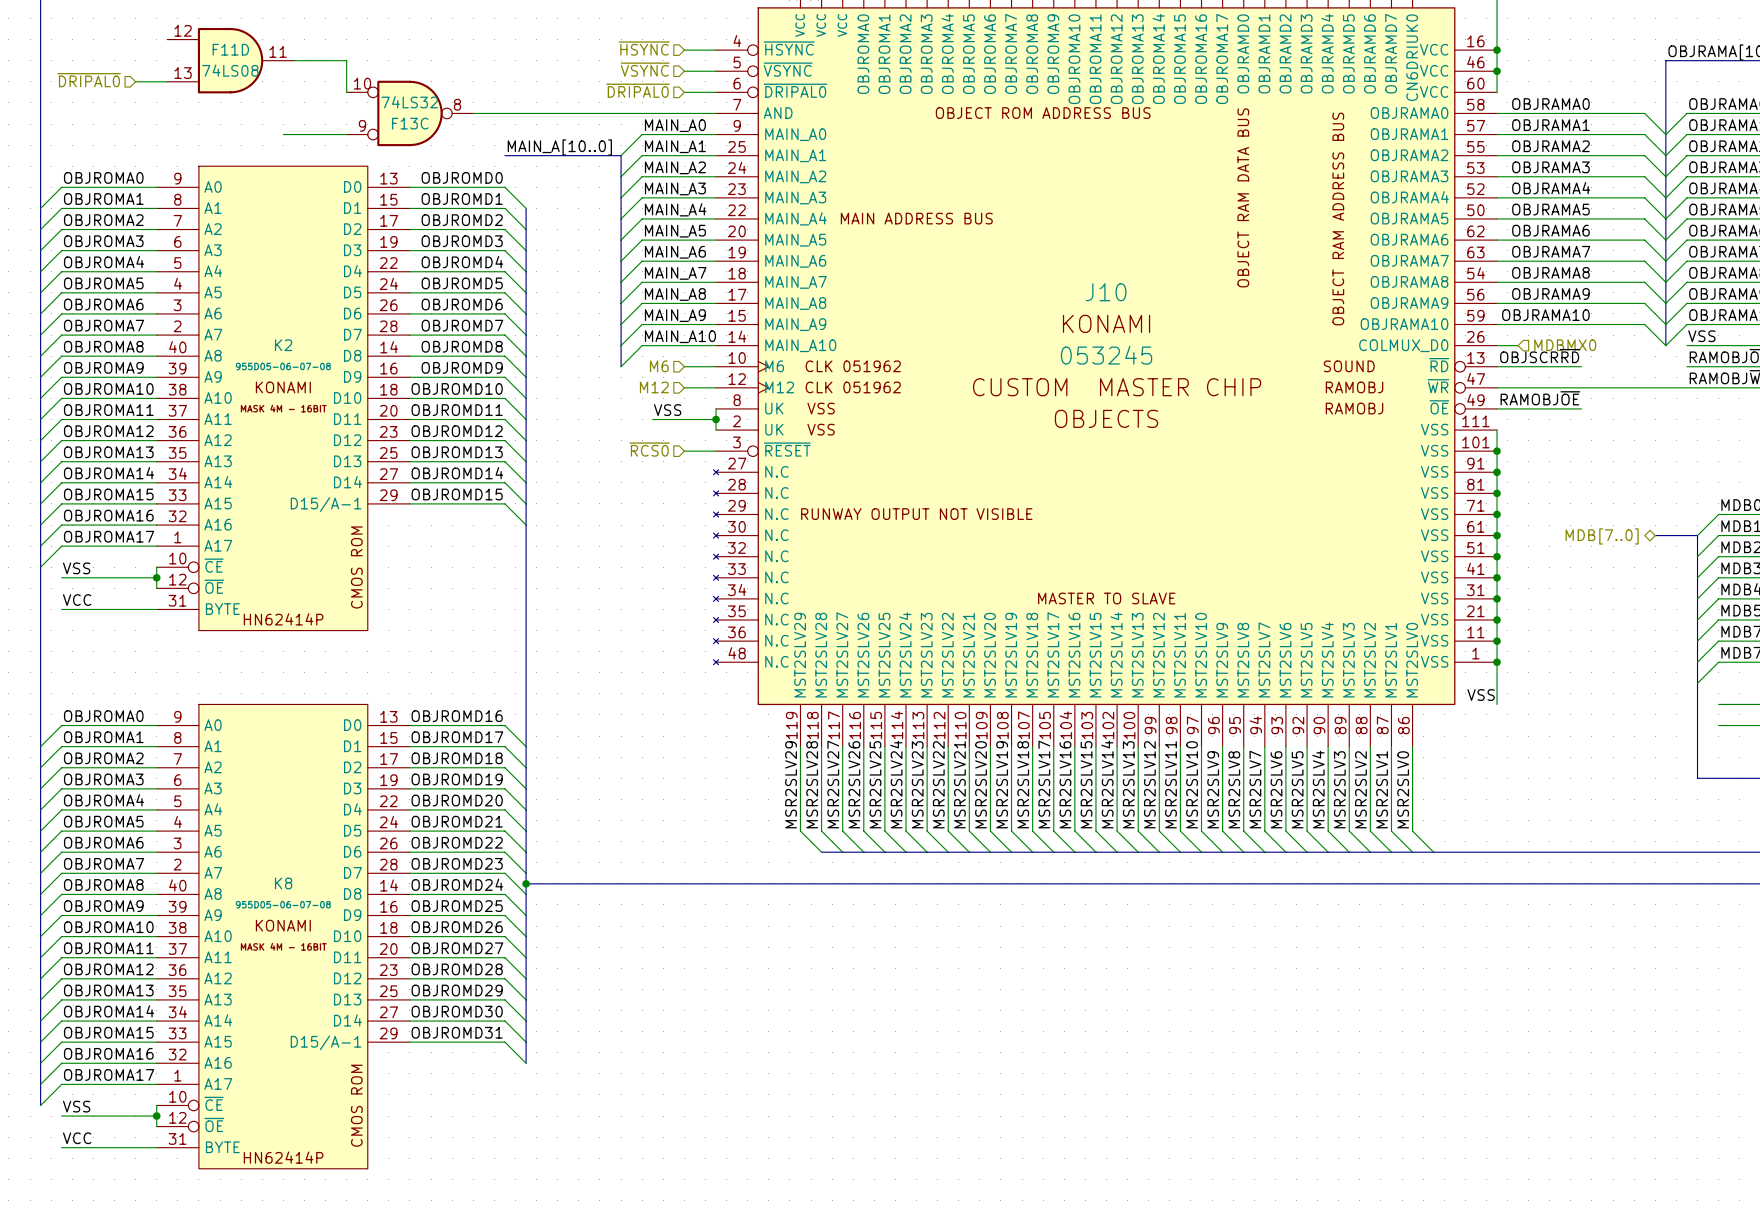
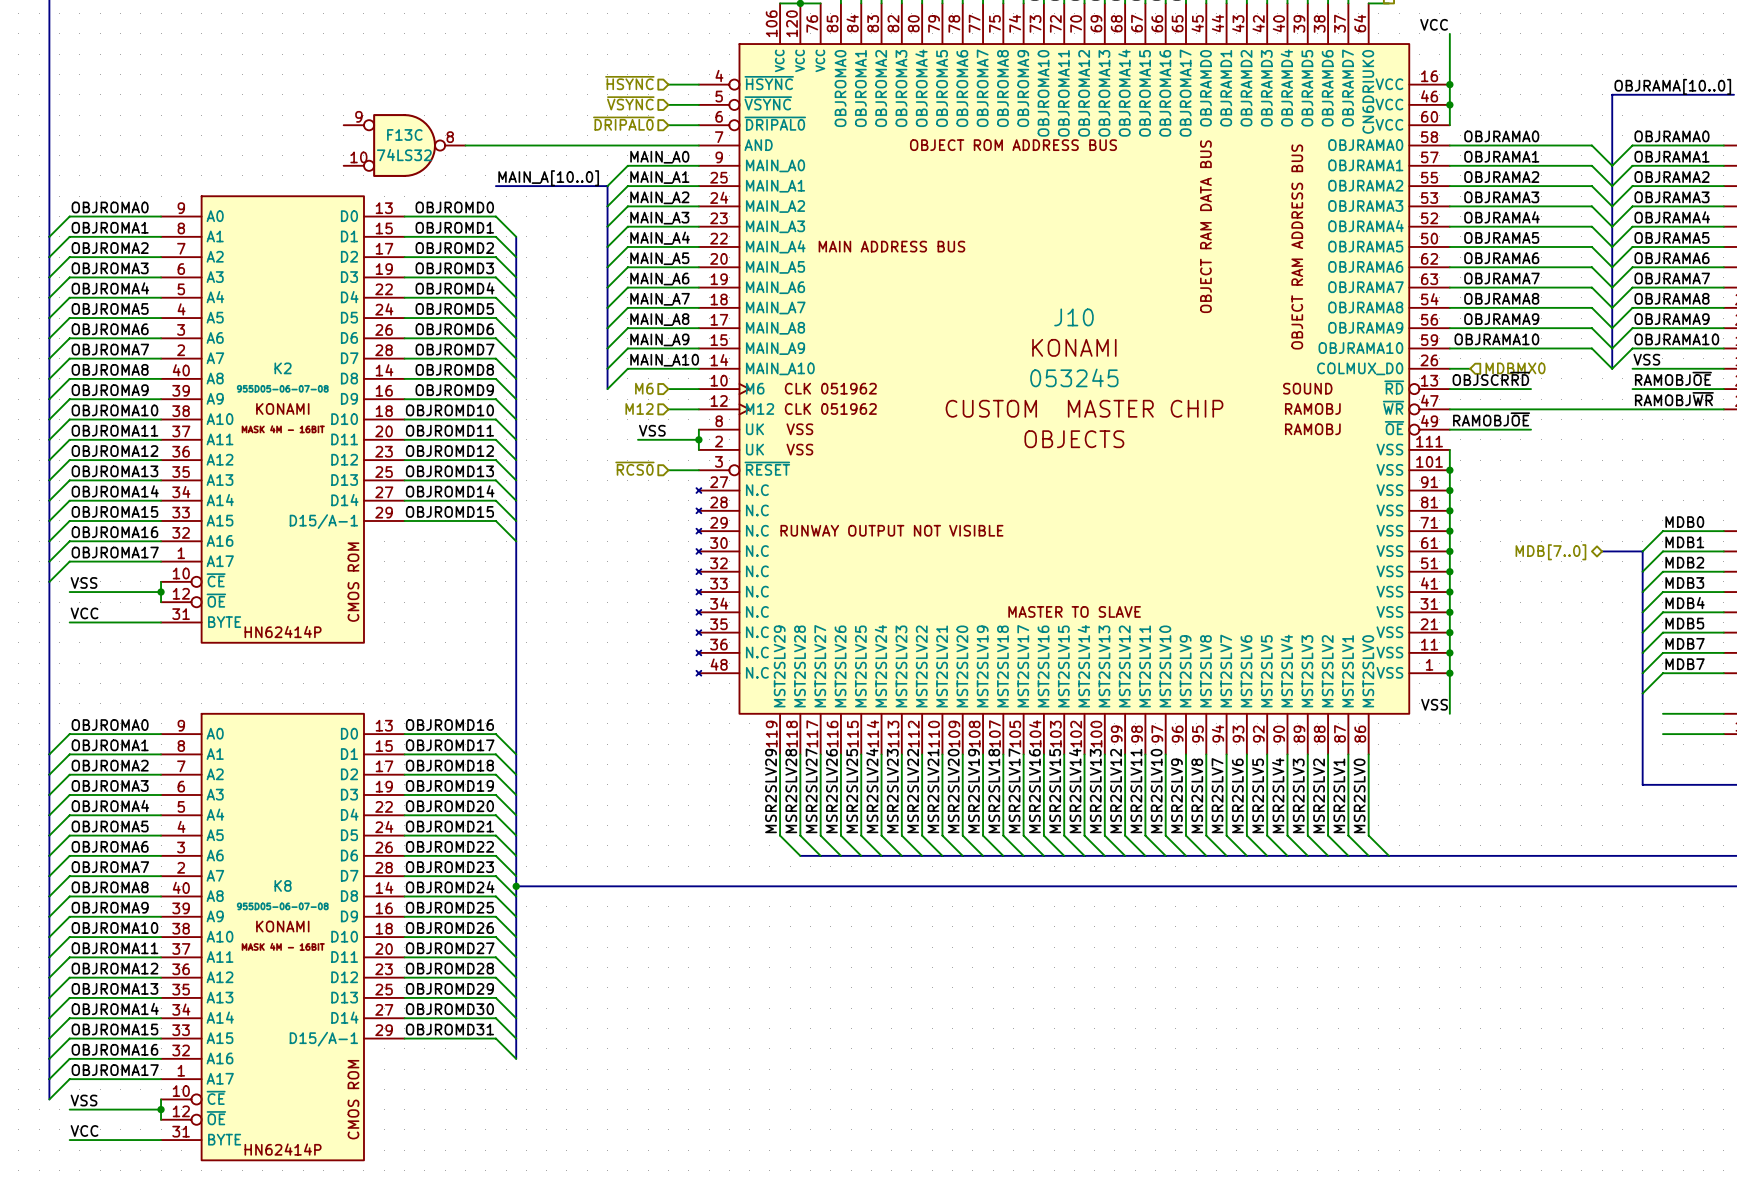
F11D: 74LS08 (230, 60) -> none
wire: (293, 60) (346, 60) (346, 92) -> none
hierarchical label: ~{DRIPAL0} (89, 80) -> none
wire: (135, 81) (167, 81) -> none
F13C flip: as is (409, 113) -> up-down (404, 145)
wire: (283, 134) (346, 134) -> none

